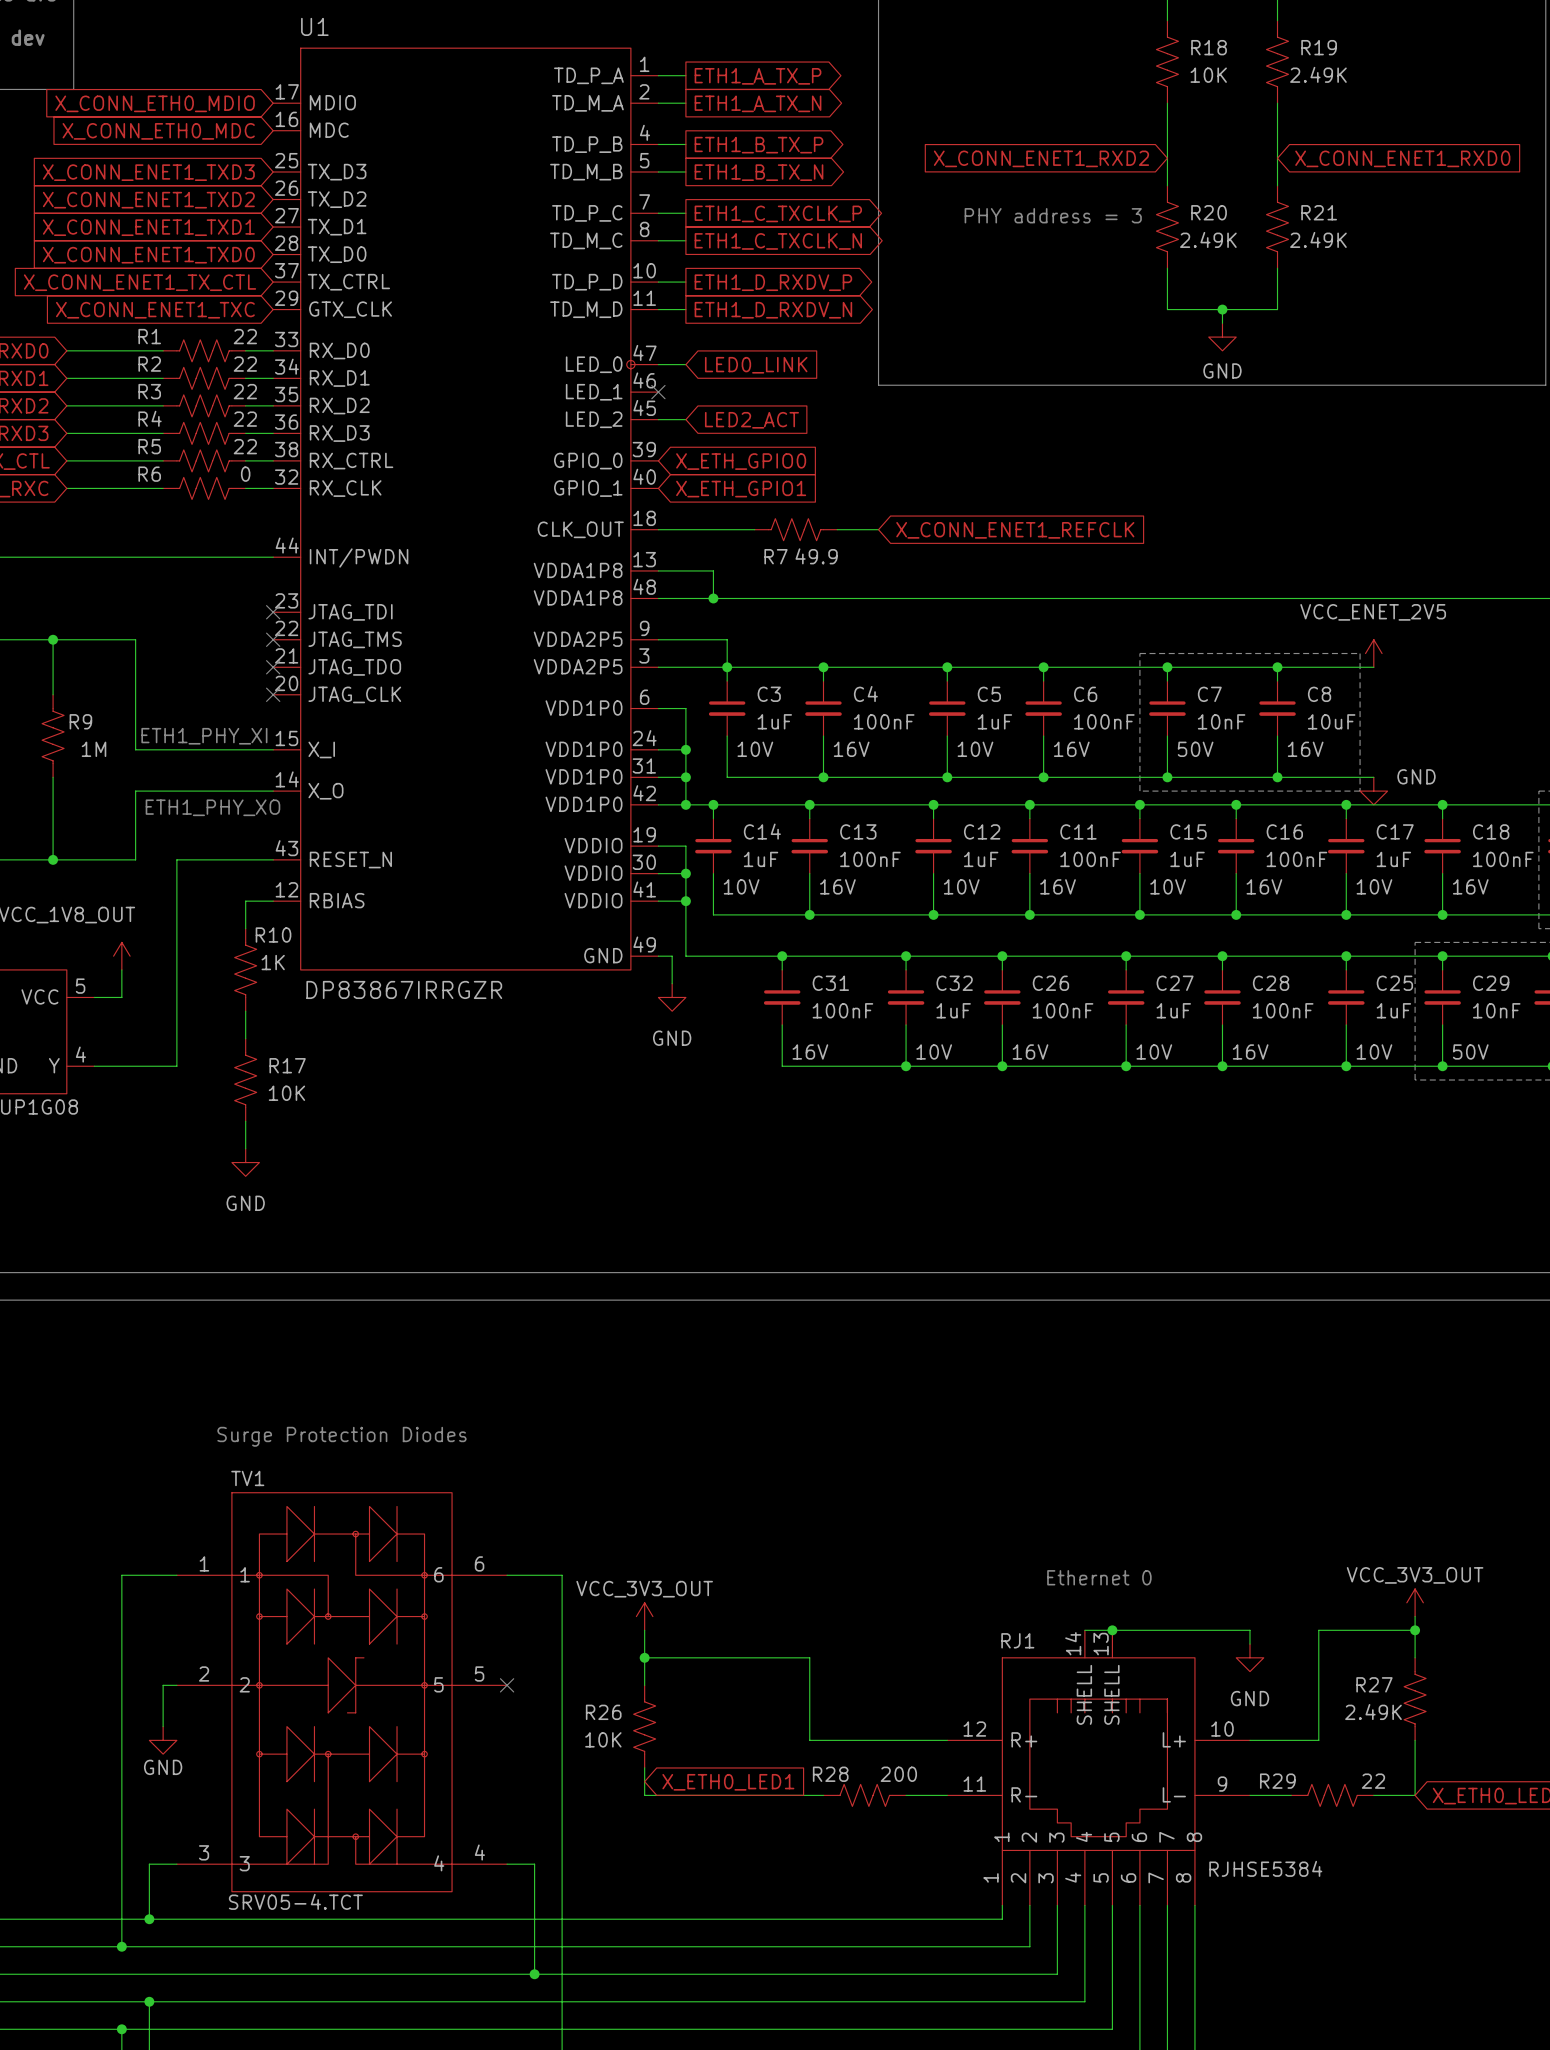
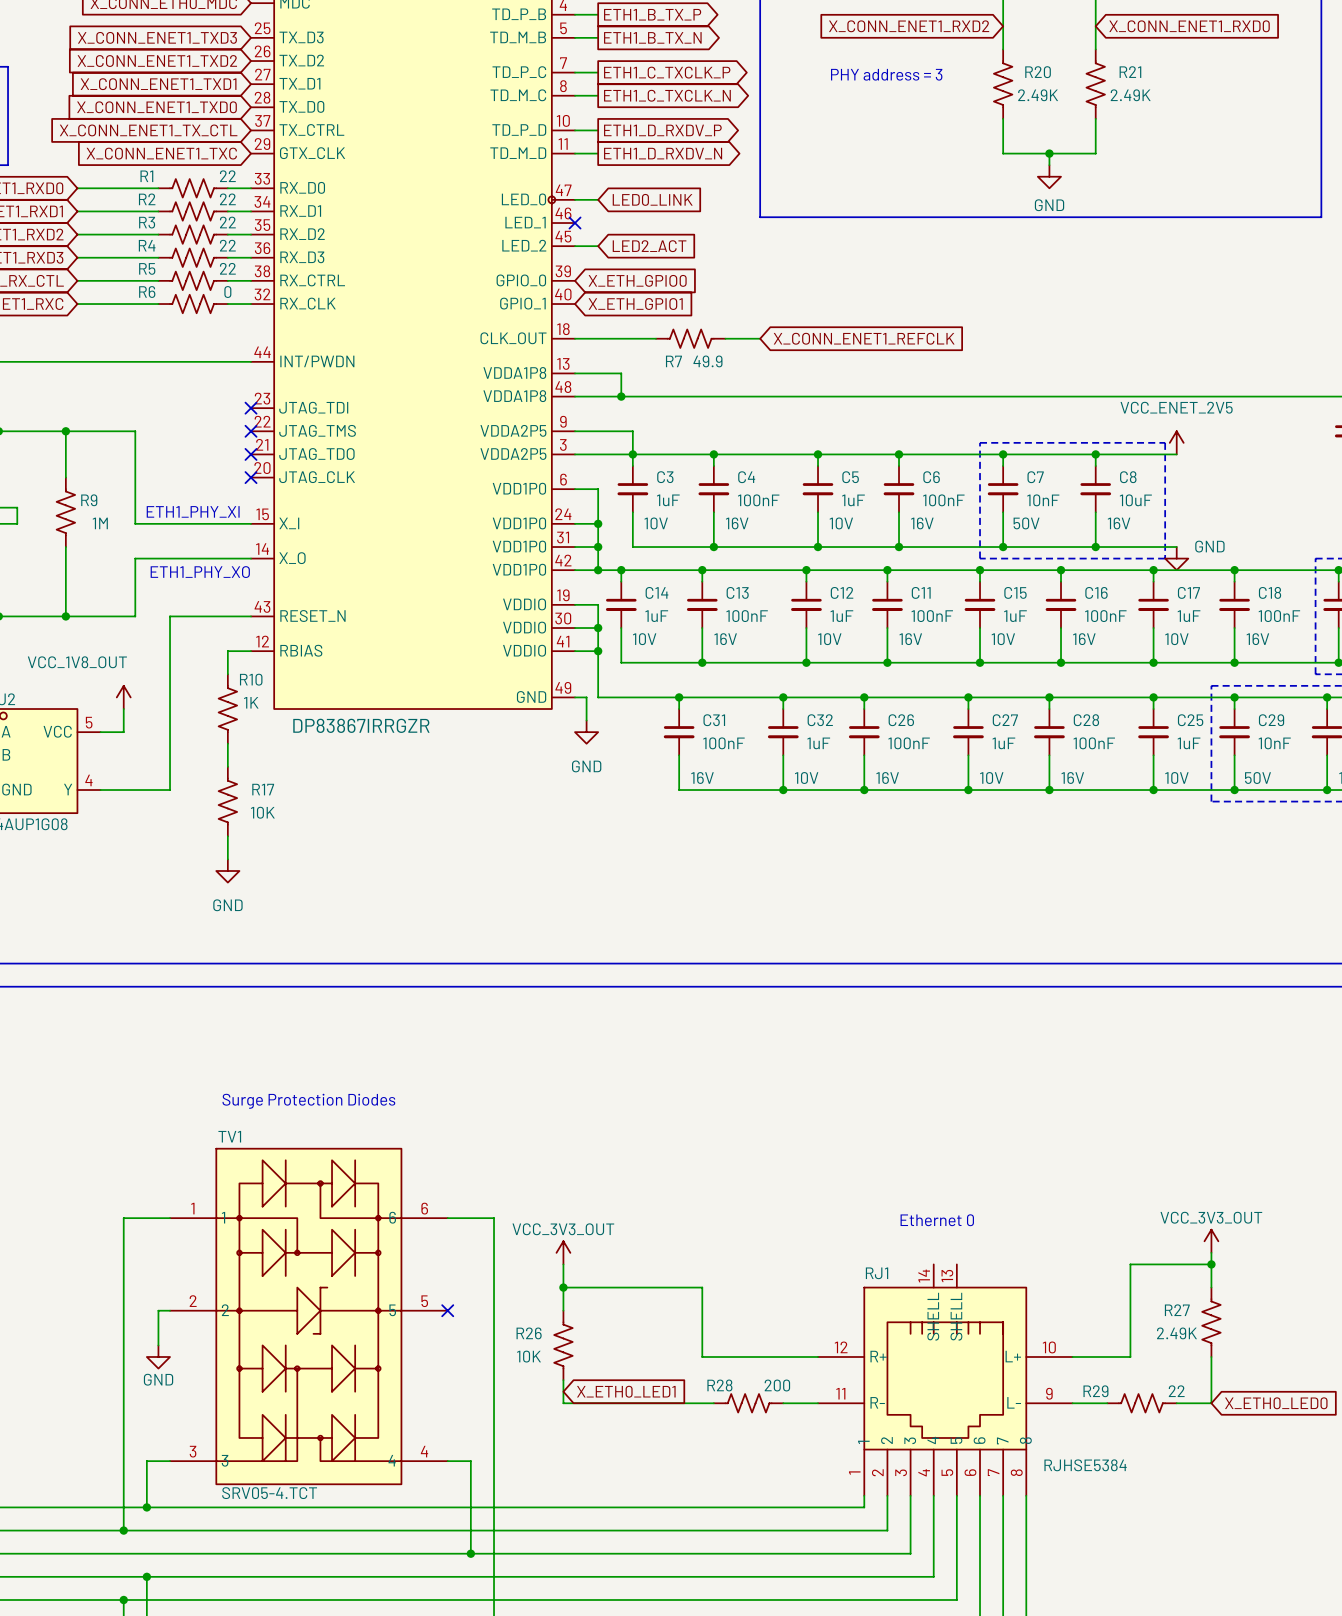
wire: (1084, 1630) (1249, 1630) (1249, 1644) -> none
junction: (1112, 1630) -> none
power symbol: GND (1249, 1657) -> none

